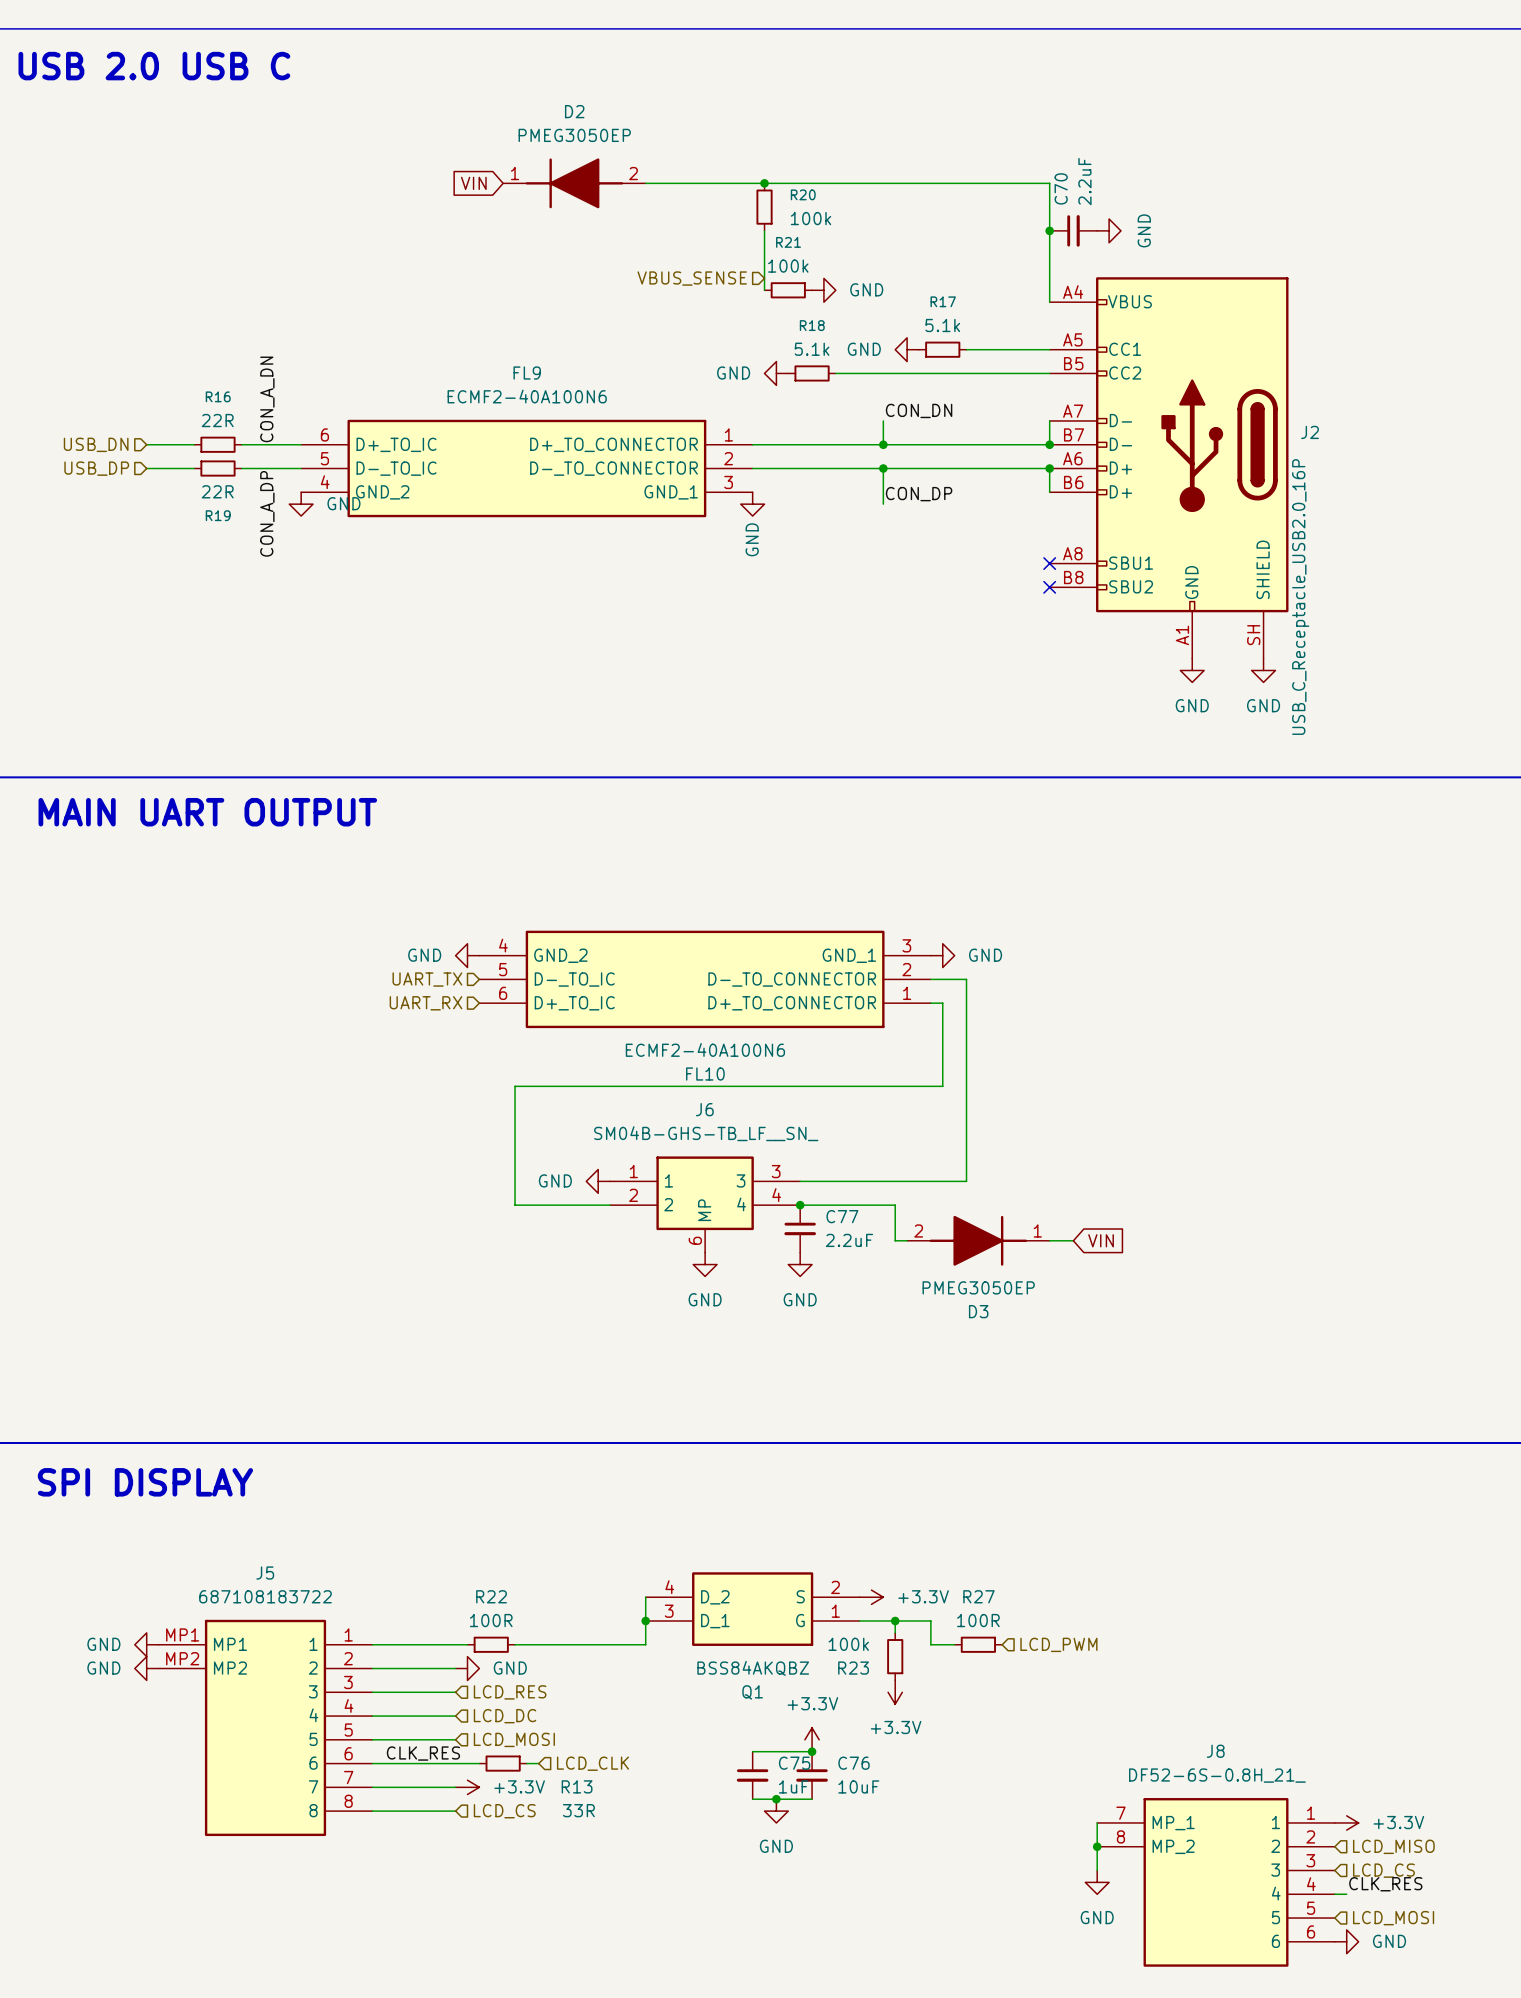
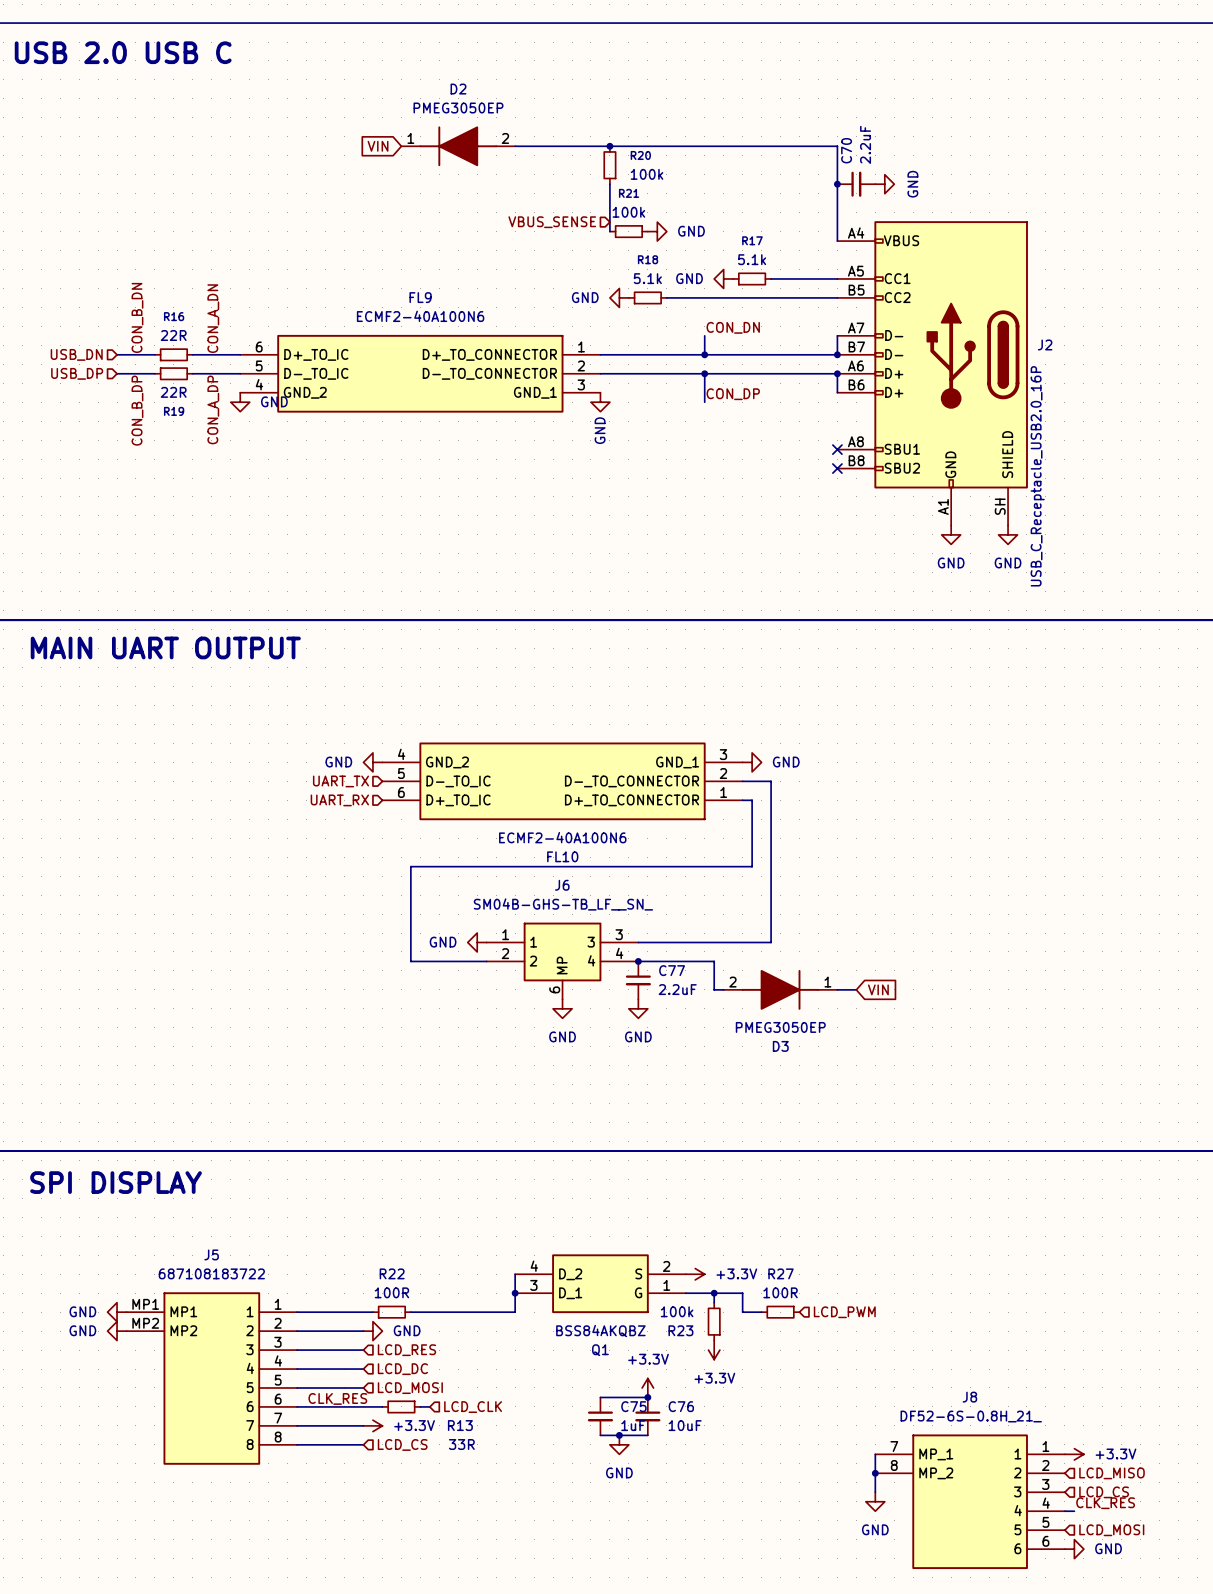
label: none -> CON_B_DN (137, 317)
label: none -> CON_B_DP (137, 410)

